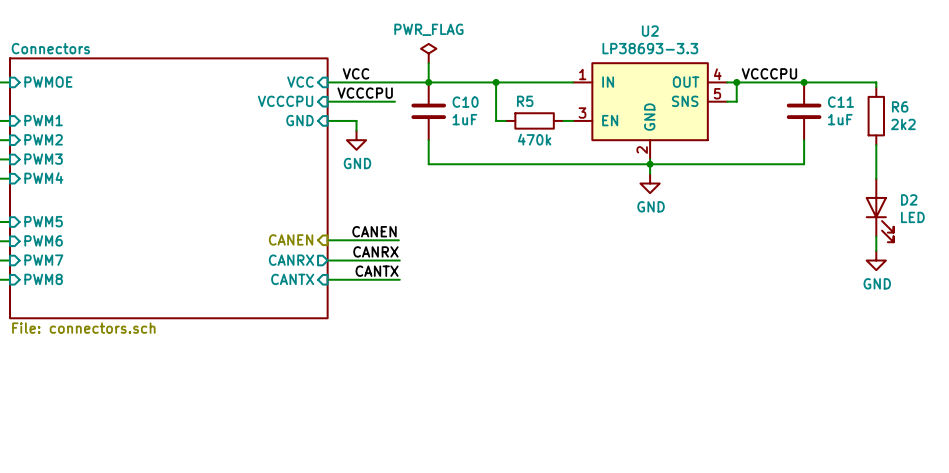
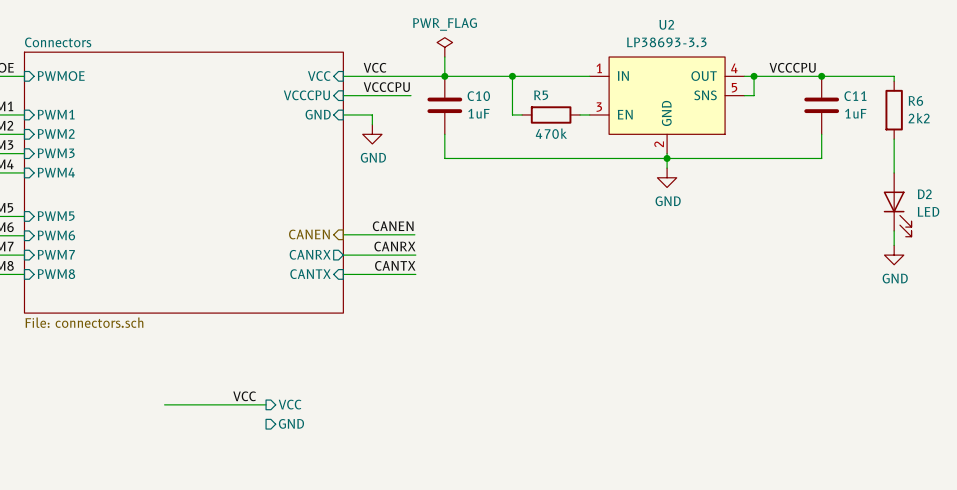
label: none -> VCC (244, 396)
wire: none -> (164, 404) (266, 404)
sheet pin: none -> VCC (290, 404)
sheet pin: none -> GND (291, 423)

